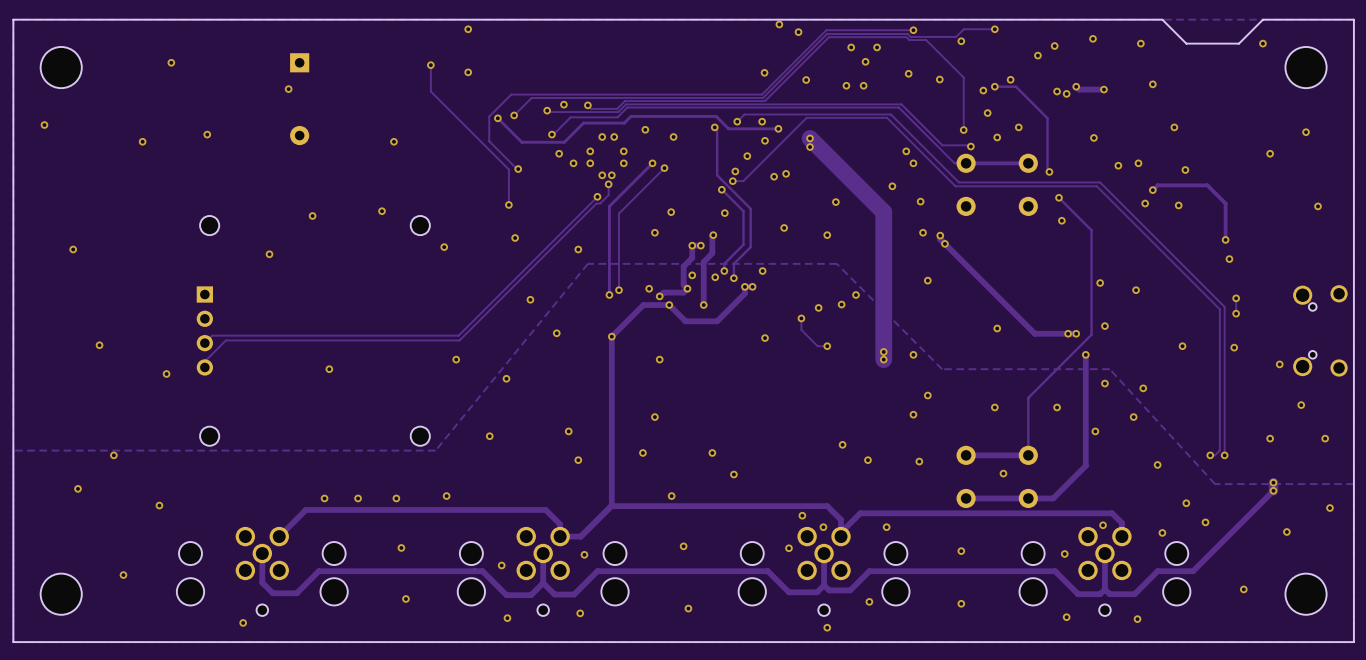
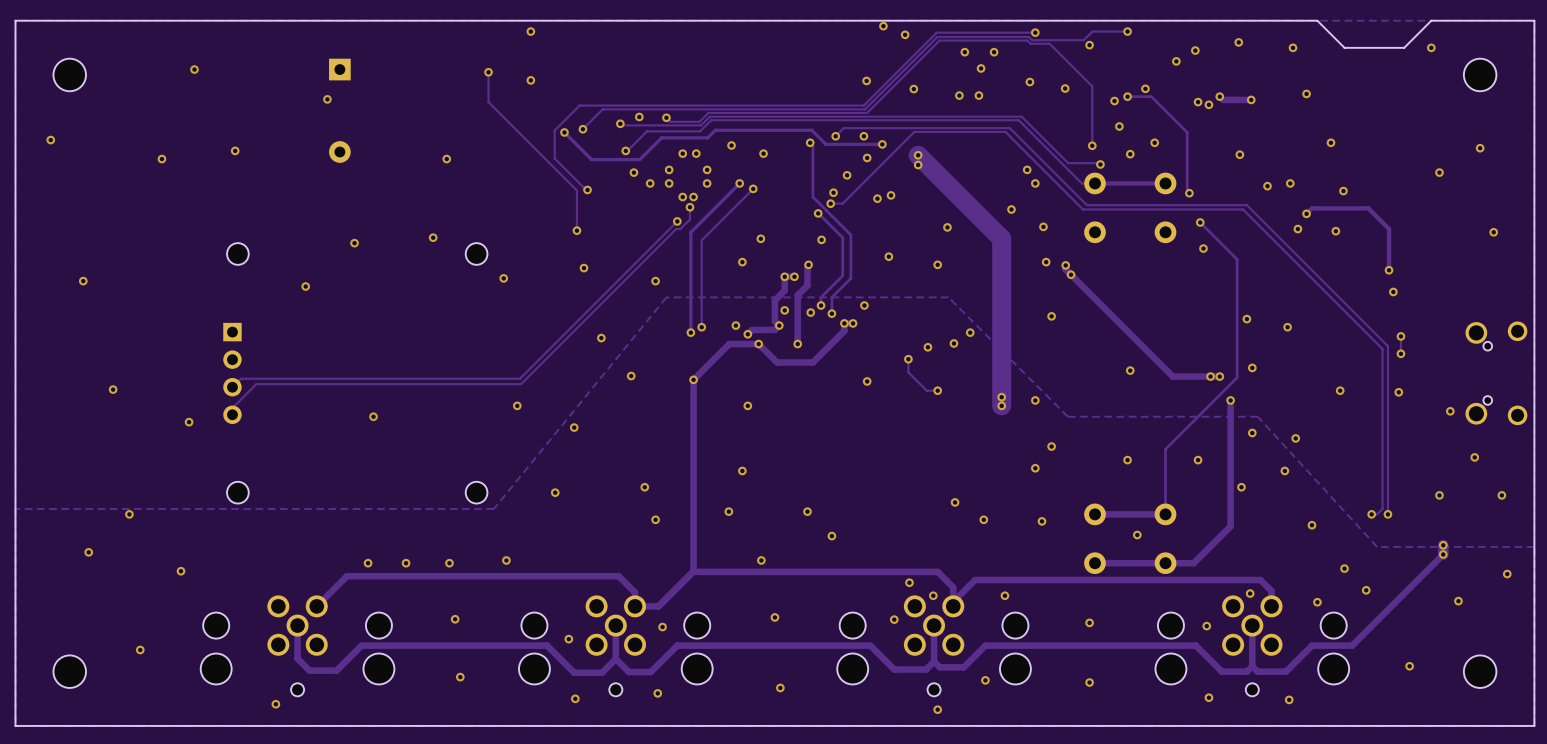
part footprint: [40, 46, 82, 89] -> [53, 58, 87, 92]
part footprint: [1285, 46, 1327, 89] -> [1463, 58, 1497, 92]
part footprint: [40, 573, 82, 615] -> [53, 655, 87, 688]
part footprint: [1285, 573, 1327, 615] -> [1463, 655, 1497, 688]

